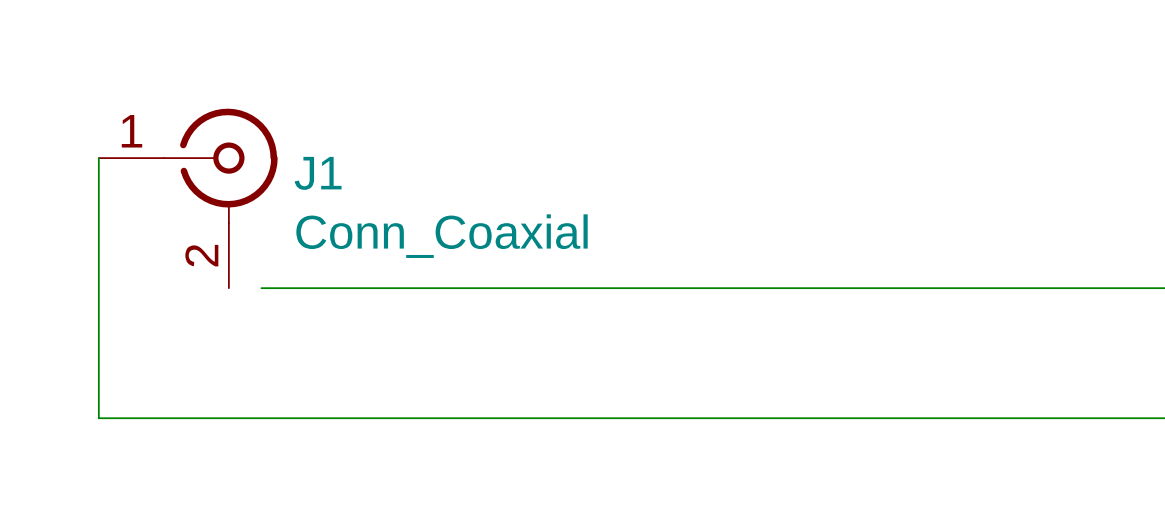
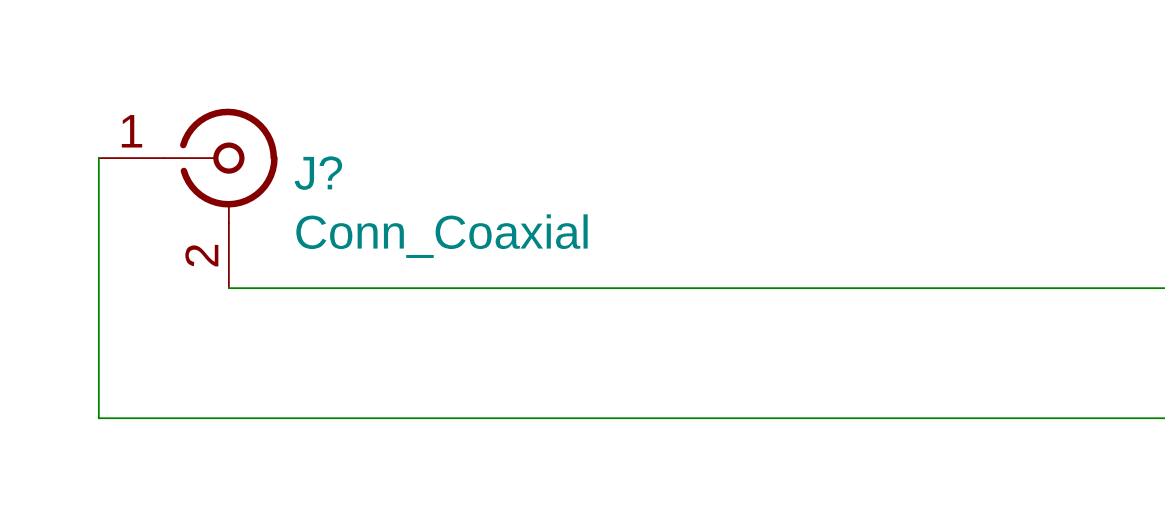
J1 name: J1 (318, 173) -> J? (318, 173)
wire: none -> (228, 288) (261, 288)

